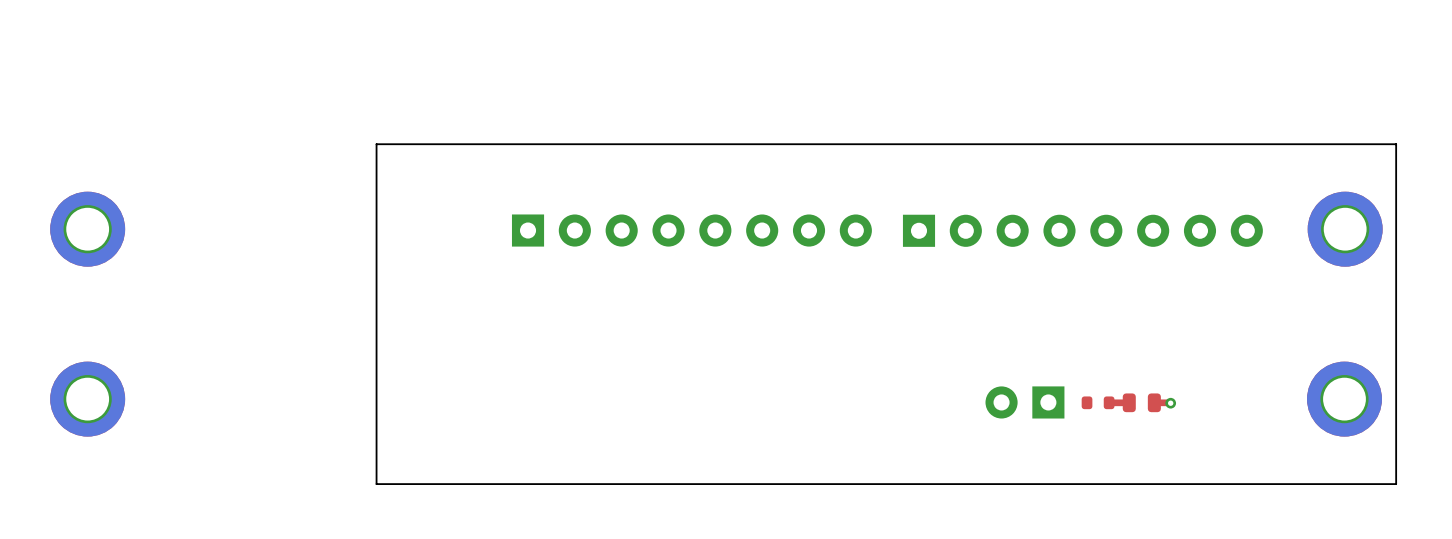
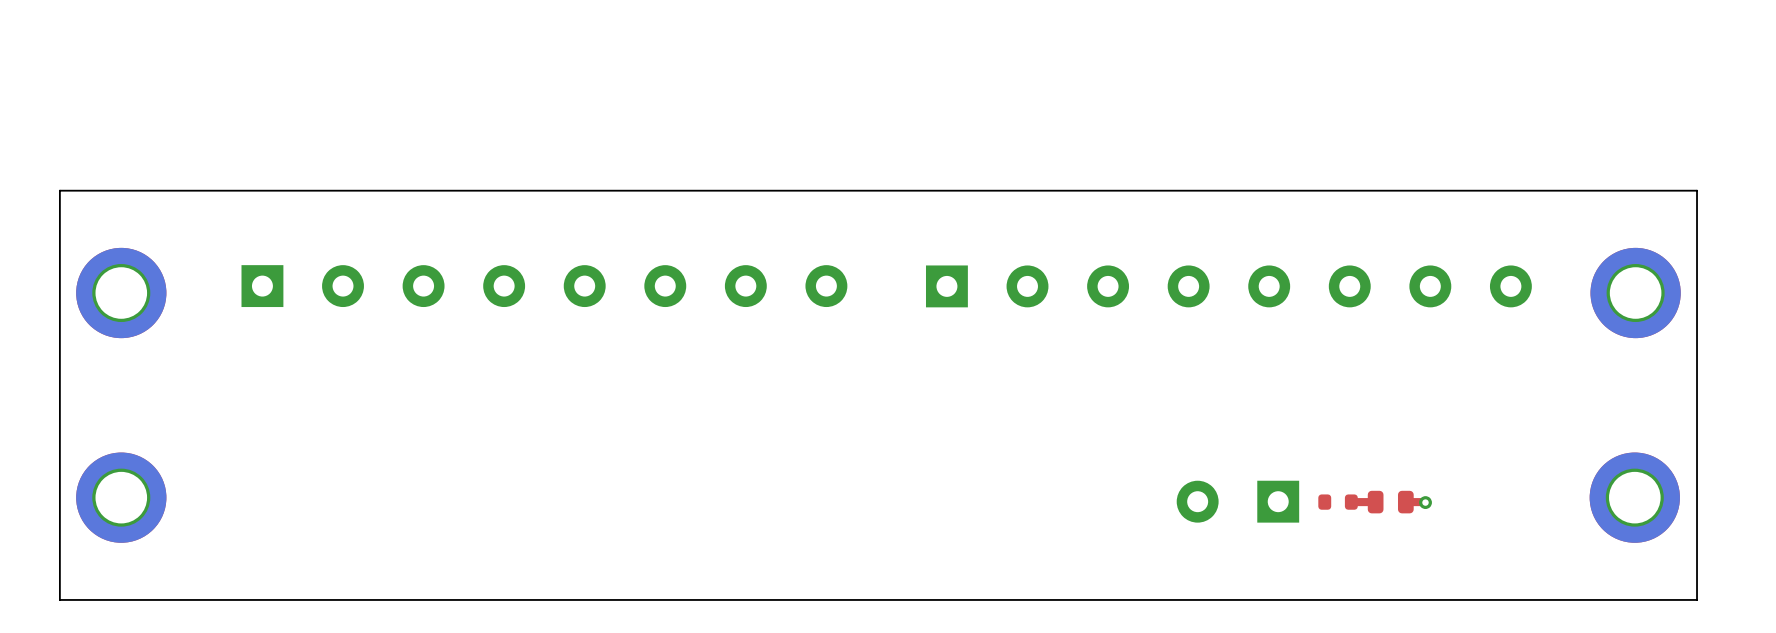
board edge: (376, 144) (376, 484) -> (469, 190) (59, 190) (59, 599) (469, 599)
part: none -> (544, 286)
part: none -> (1228, 286)
part: (691, 230) -> none
part: (1082, 230) -> none
part footprint: [985, 386, 1065, 419] -> [1176, 480, 1300, 523]

